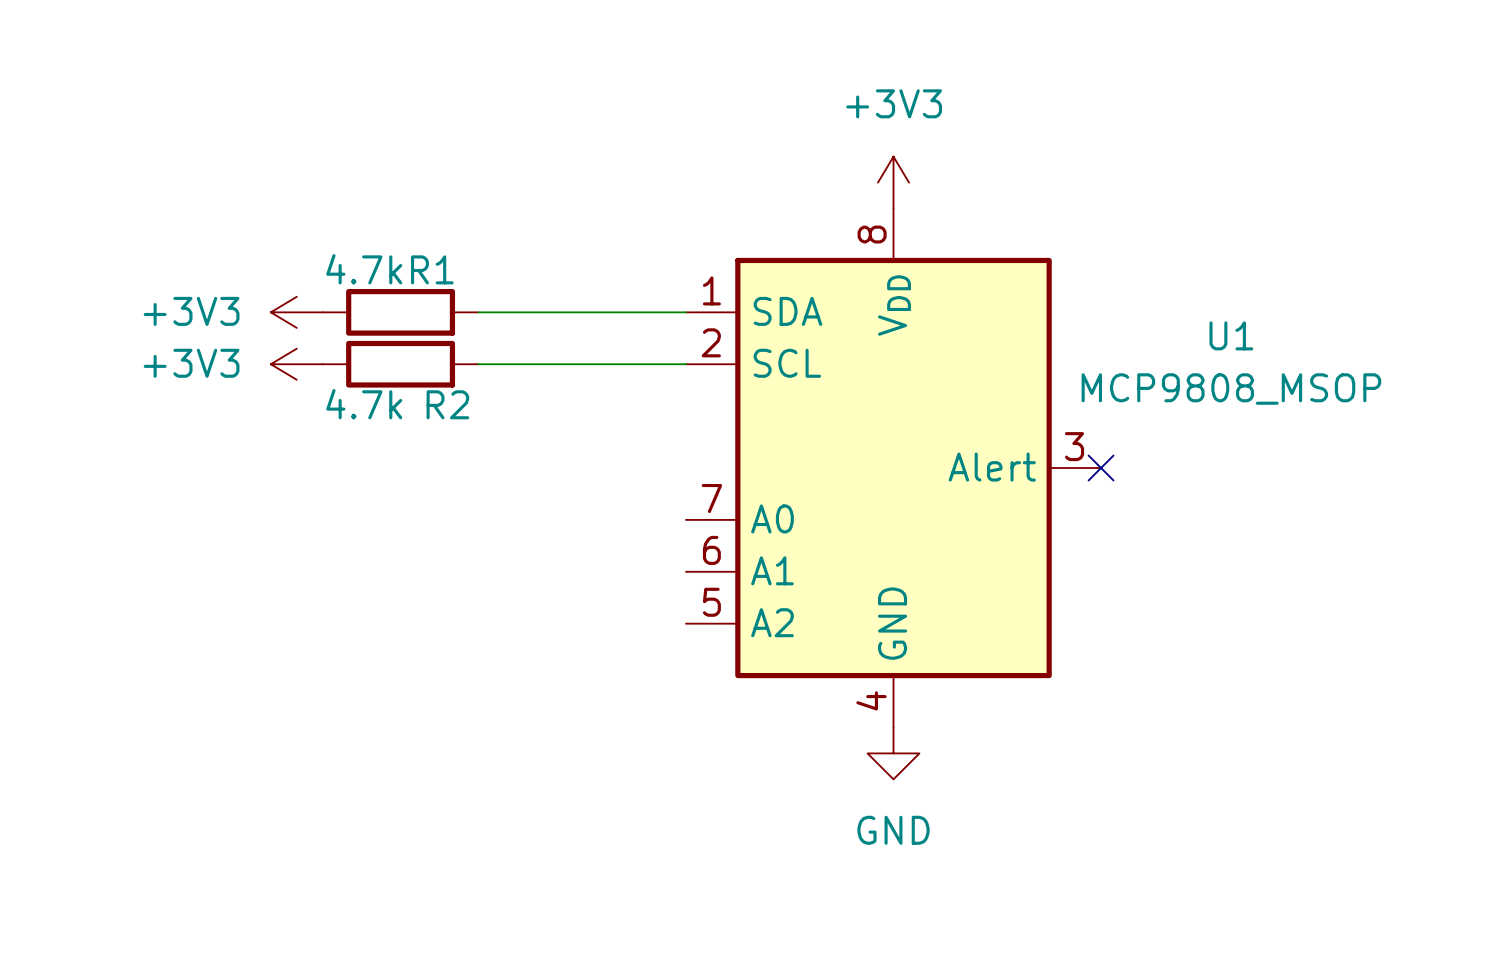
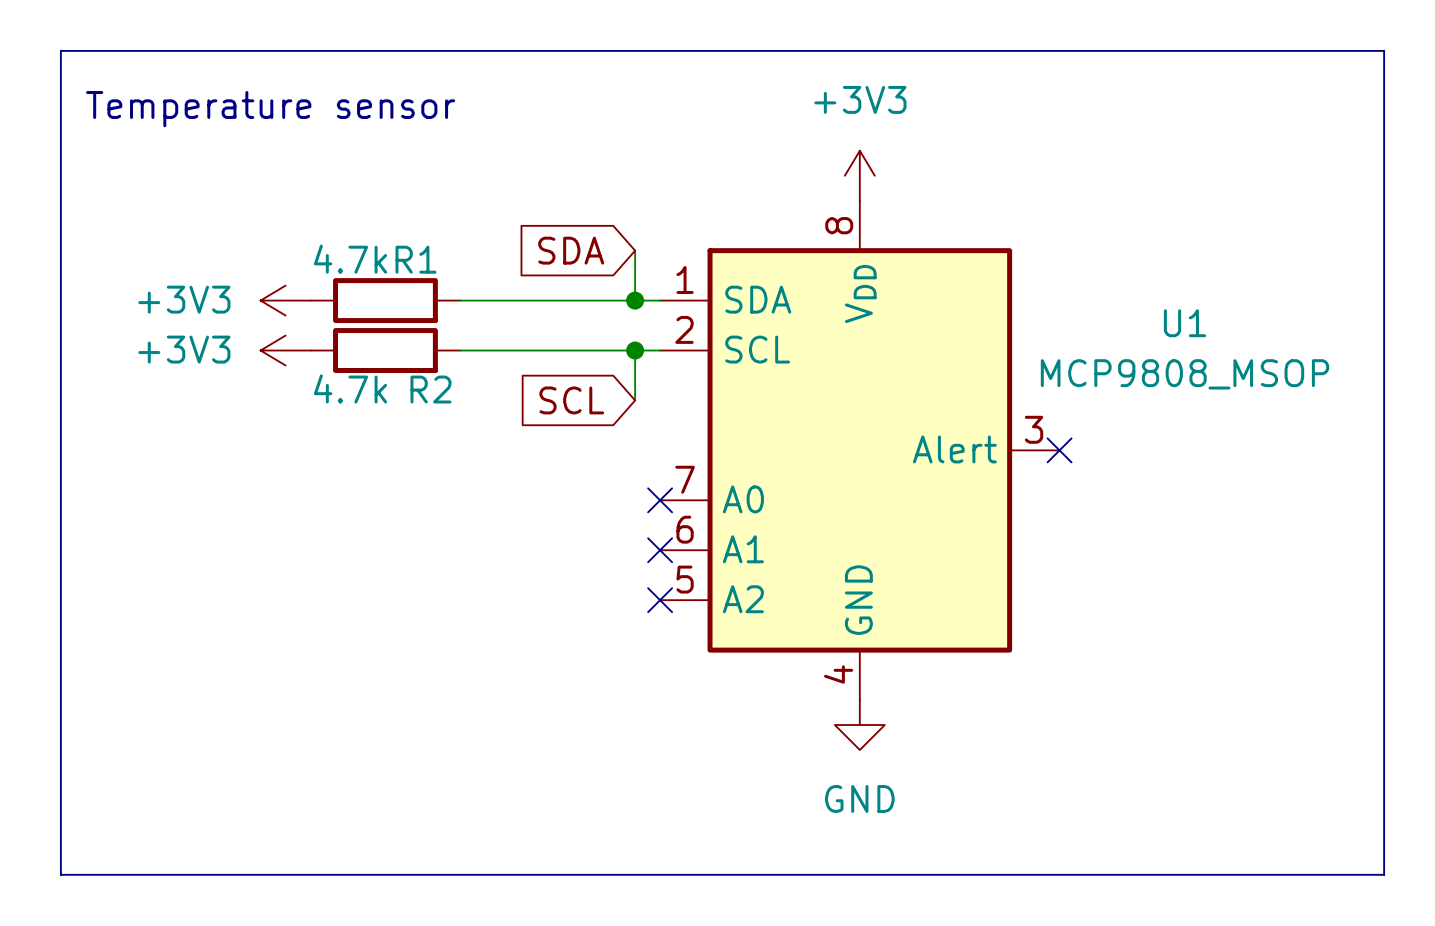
line: none -> (60, 50) (1384, 50) (1384, 874) (60, 874) (60, 50)
text: none -> Temperature sensor (270, 109)
global label: none -> SDA (571, 250)
wire: none -> (635, 250) (635, 300)
junction: none -> (635, 300)
wire: none -> (635, 350) (635, 400)
junction: none -> (635, 350)
global label: none -> SCL (571, 400)
no-connect mark: none -> (660, 500)
no-connect mark: none -> (660, 550)
no-connect mark: none -> (660, 600)

